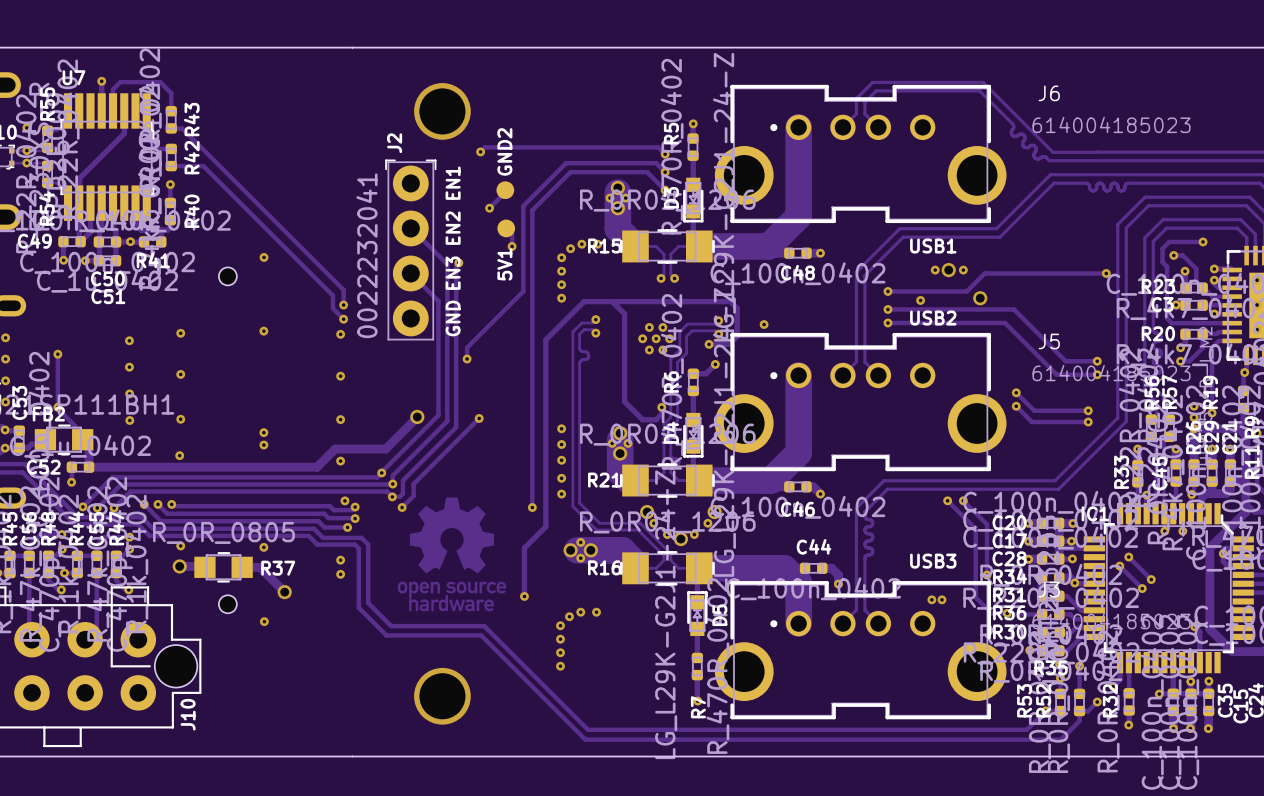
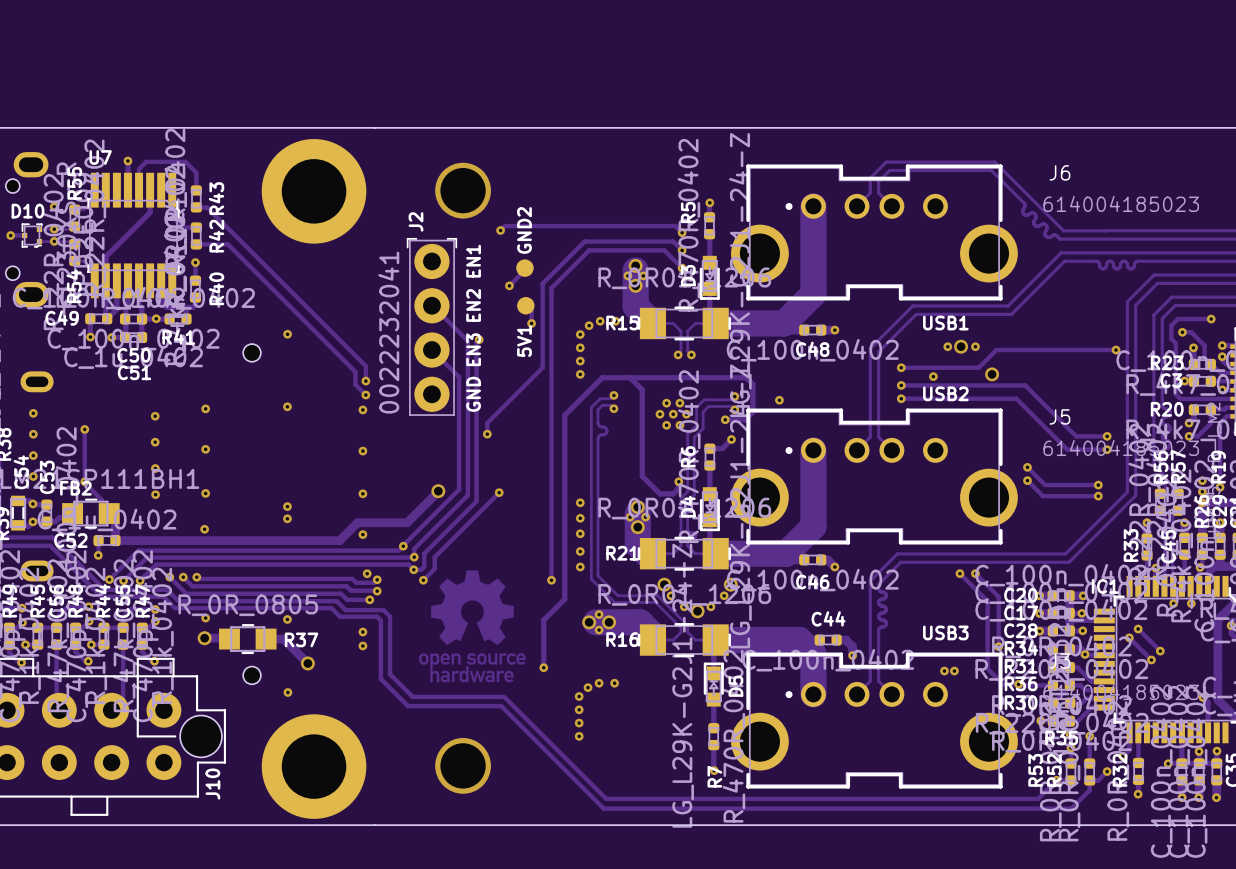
part: none -> (314, 191)
part: none -> (314, 766)

